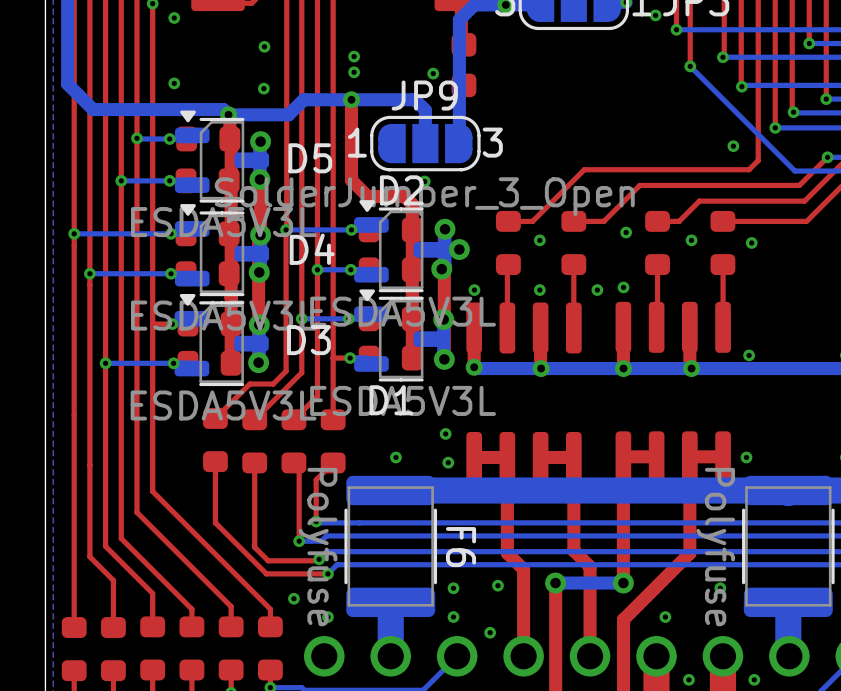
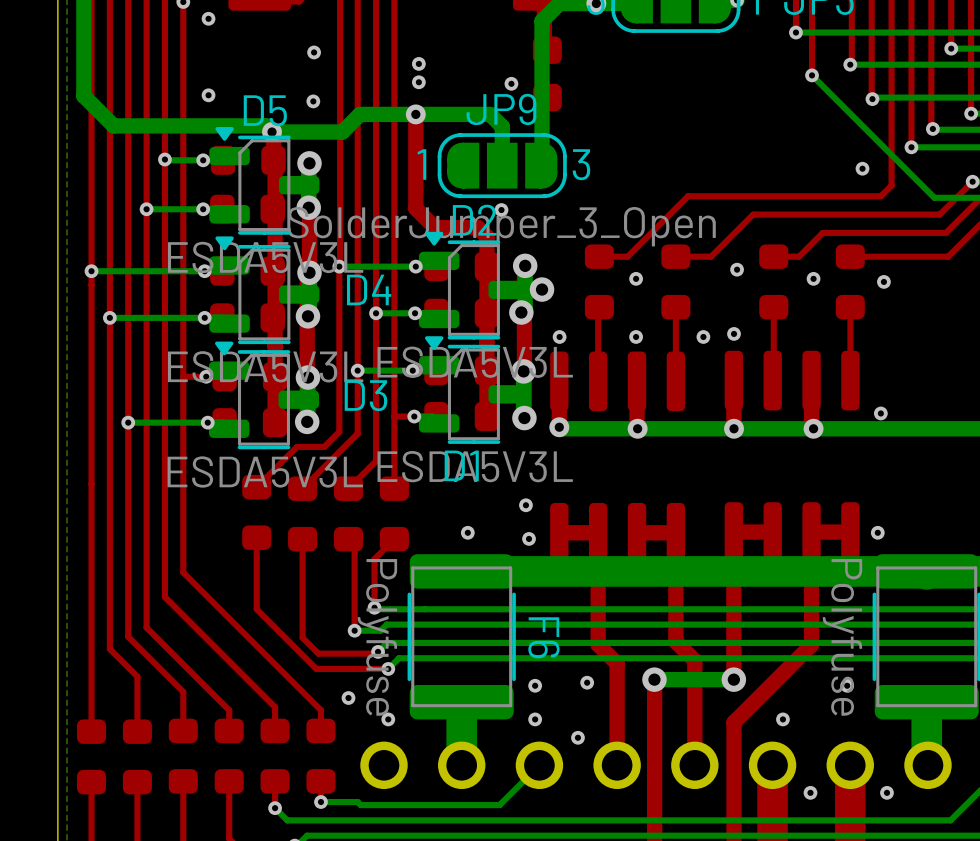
via: (655, 15) -> none
D5 name position: D5 (310, 158) -> D5 (265, 110)

